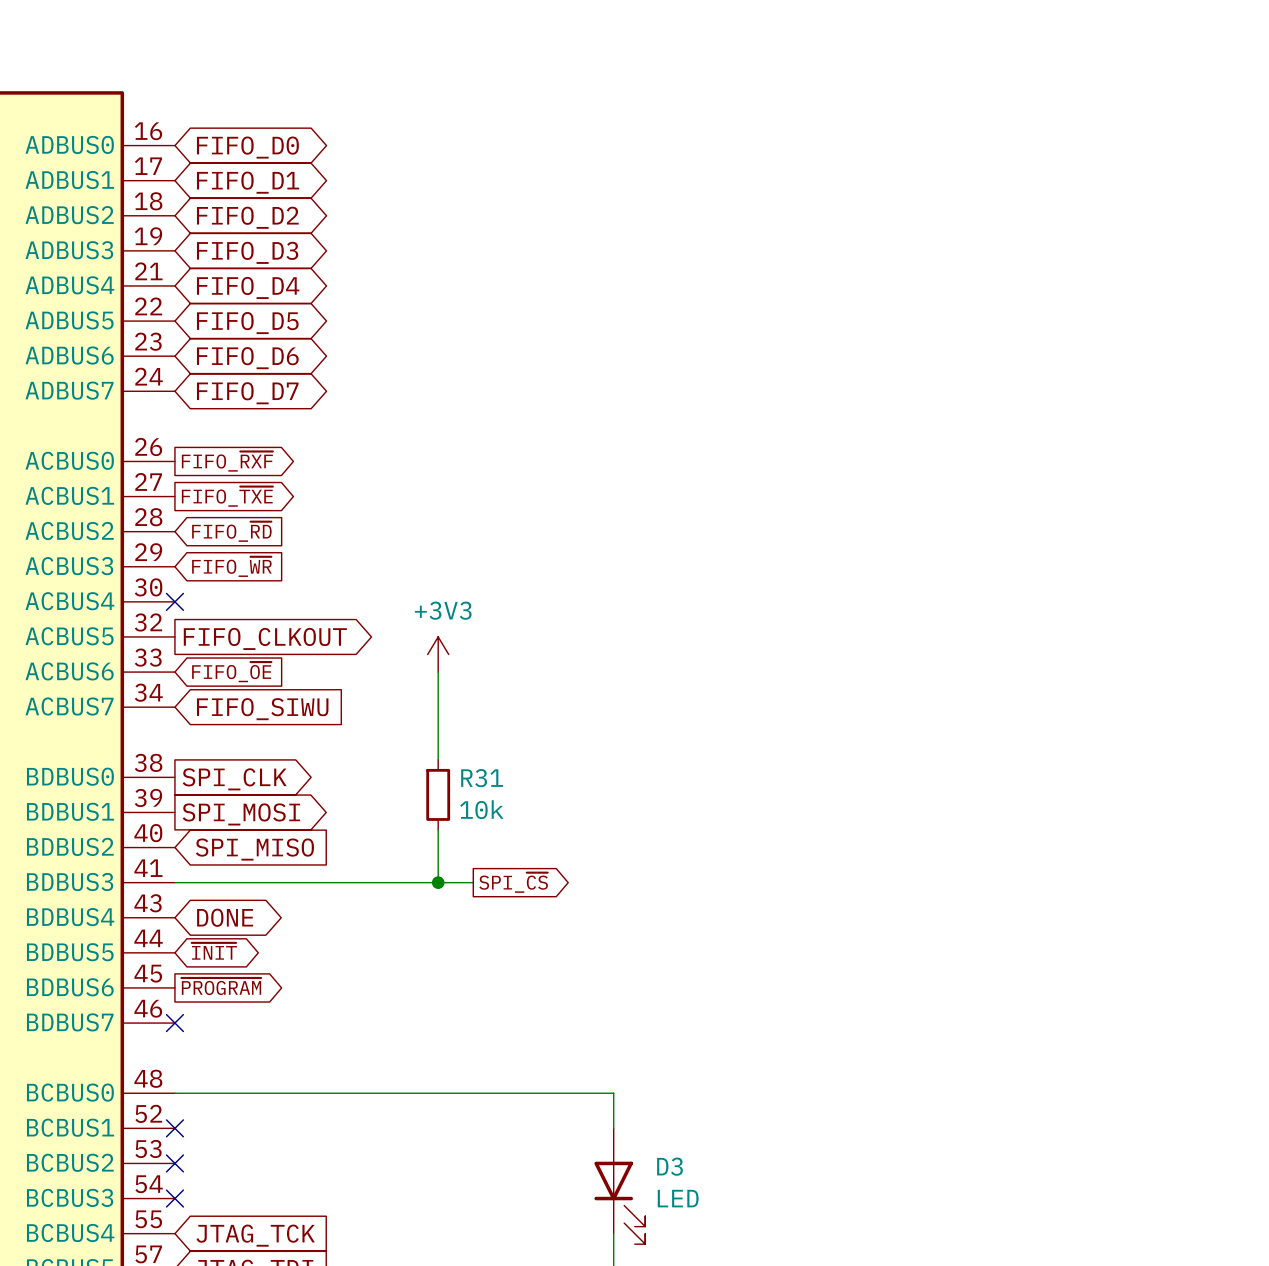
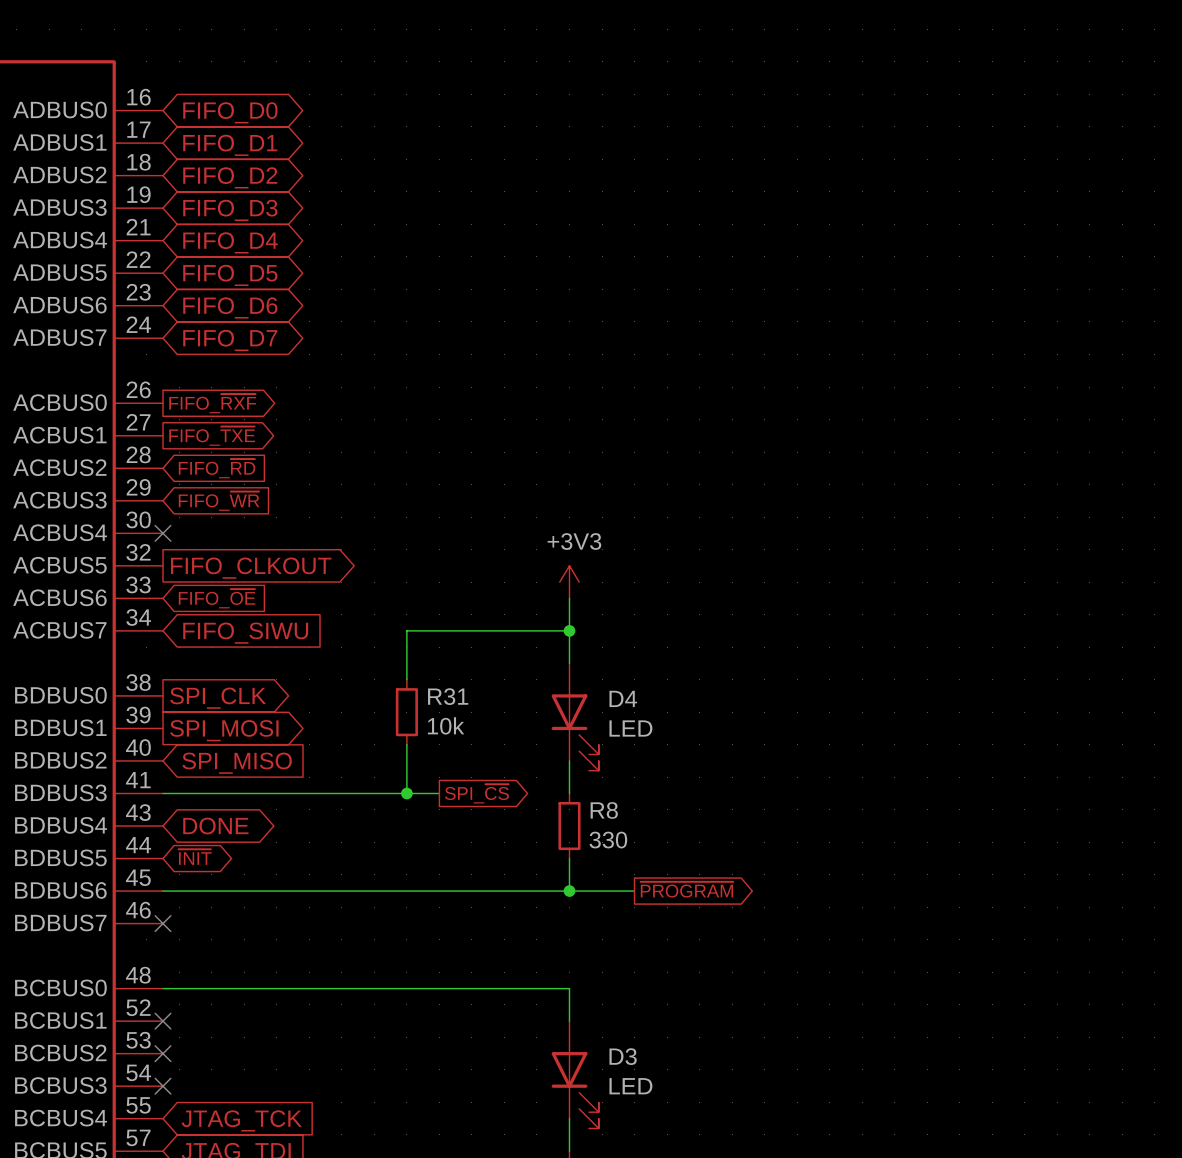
power symbol position: +3V3 (438, 654) -> +3V3 (569, 582)
wire: (438, 672) (438, 707) -> (569, 630) (406, 630)
wire: none -> (569, 598) (569, 663)
junction: none -> (569, 630)
D4: none -> LED (575, 717)
wire: none -> (569, 760) (569, 793)
R8: none -> 330 (569, 826)
wire: none -> (569, 858) (569, 891)
global label: ~{PROGRAM} (221, 986) -> none
global label: none -> ~{PROGRAM} (686, 889)
wire: none -> (162, 891) (634, 891)
junction: none -> (569, 891)

